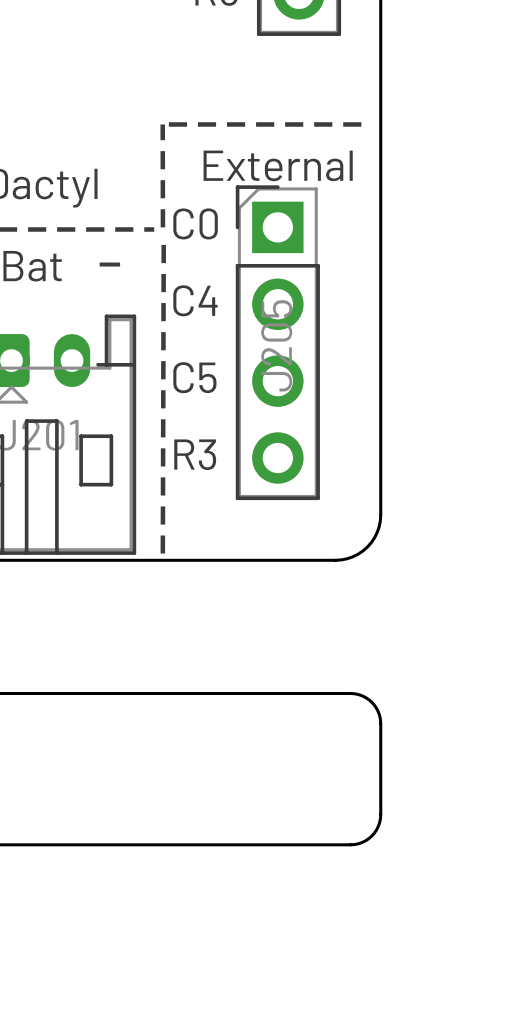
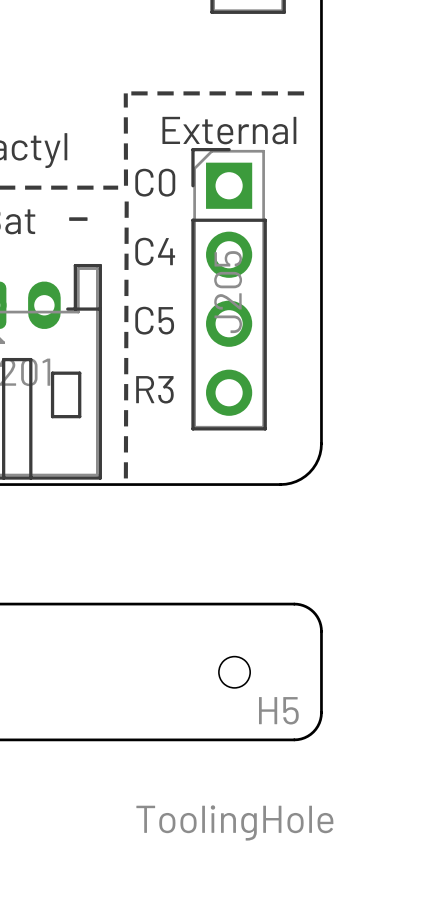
H5: none -> ToolingHole (234, 672)

